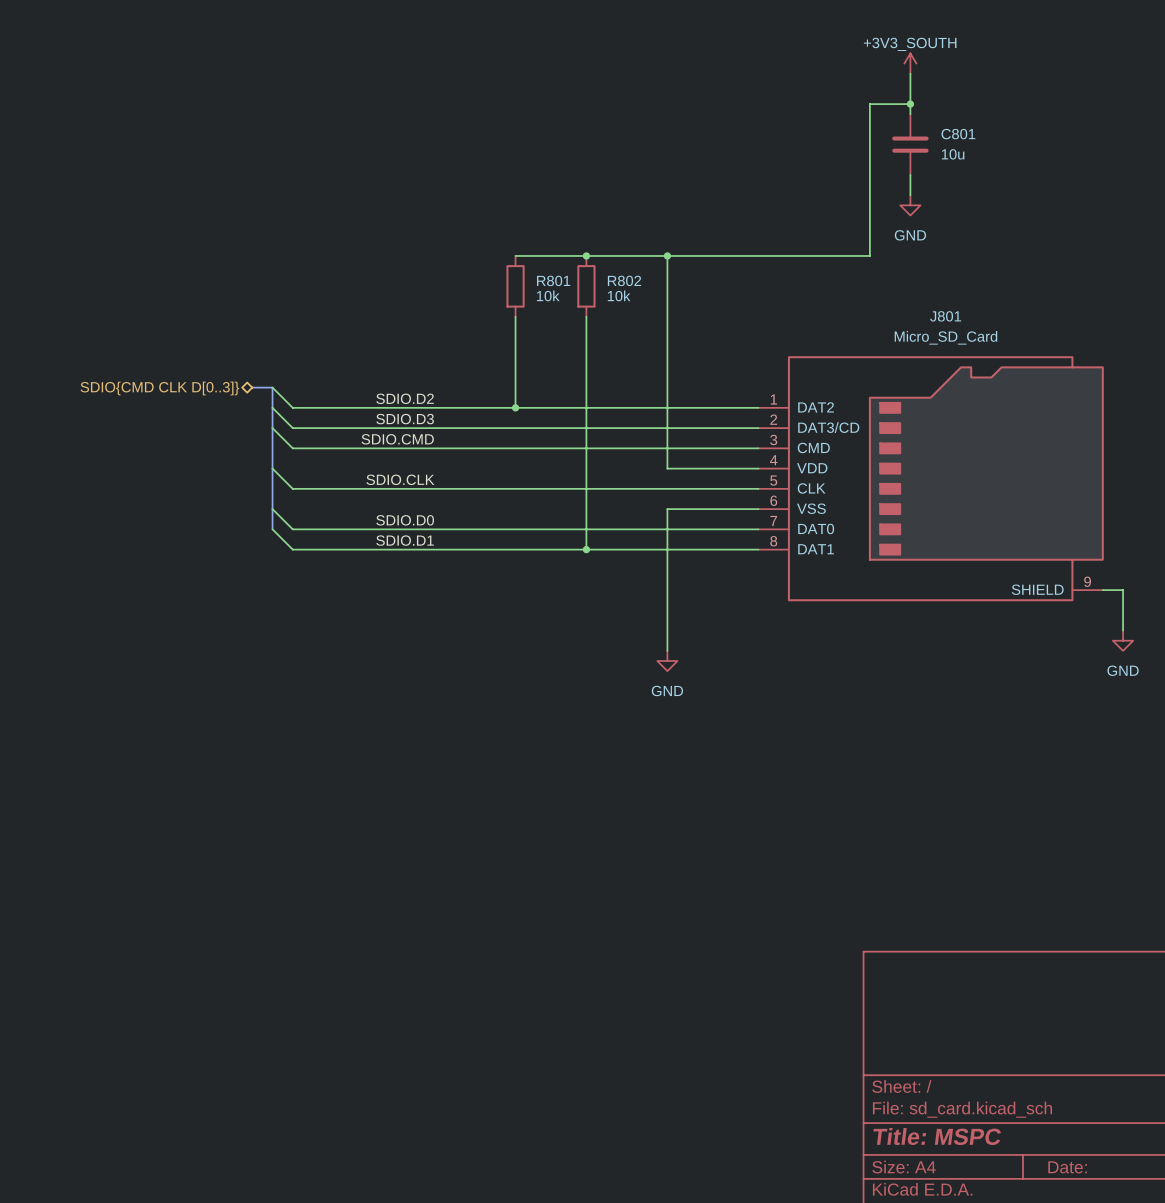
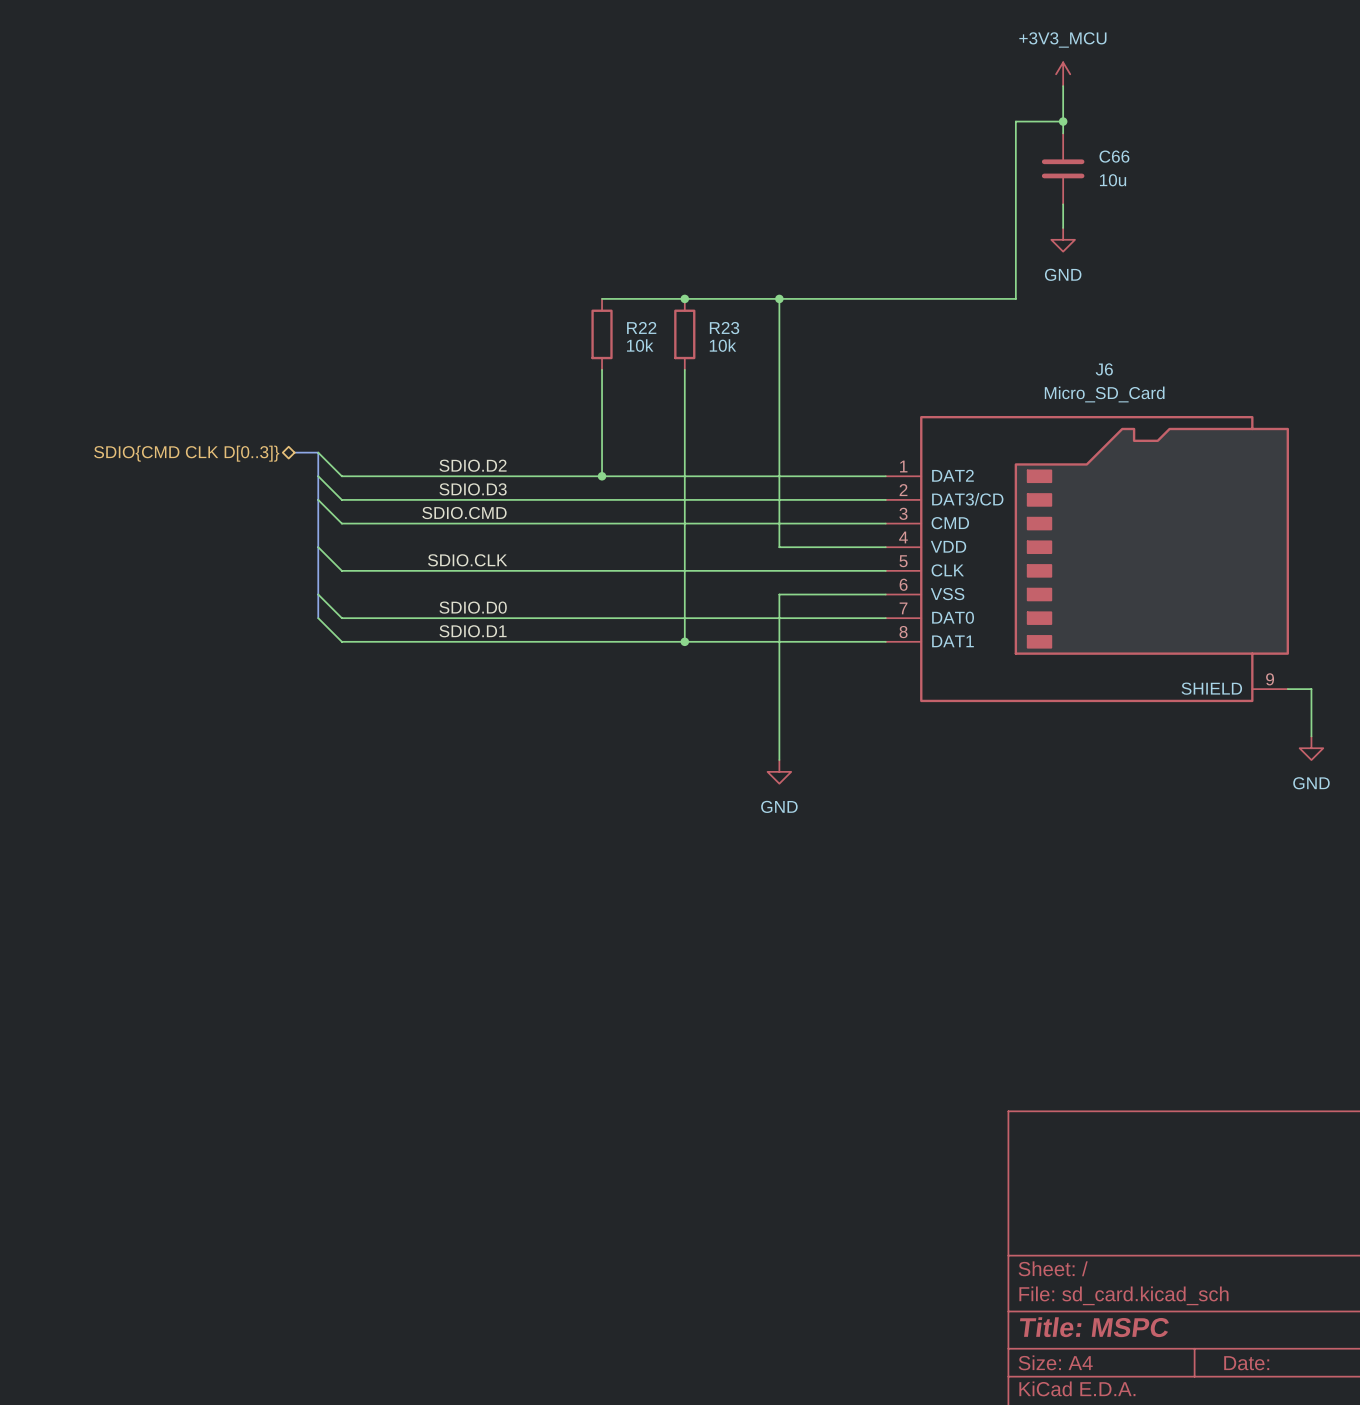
power symbol: +3V3_SOUTH (910, 63) -> +3V3_MCU (1063, 74)
C801 name: C801 (958, 134) -> C66 (1114, 156)
R801 name: R801 (553, 280) -> R22 (641, 327)
R802 name: R802 (624, 280) -> R23 (724, 328)
J801 name: J801 (945, 316) -> J6 (1104, 369)

